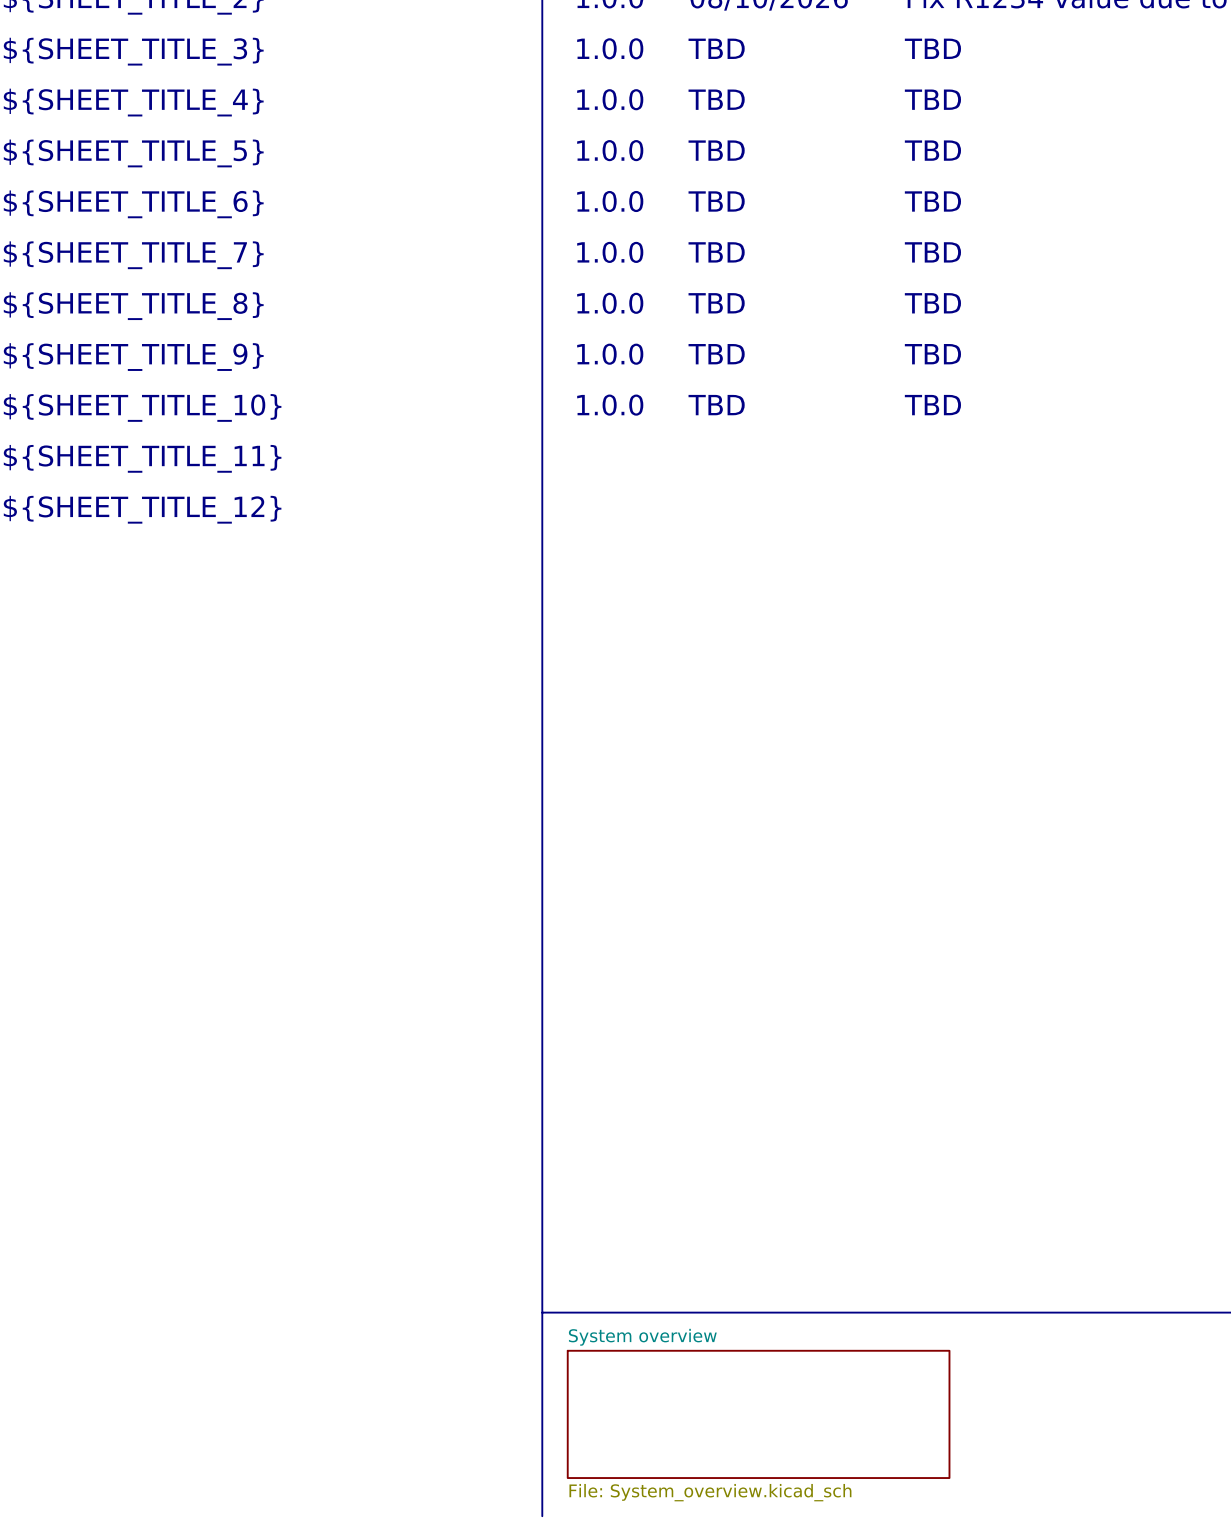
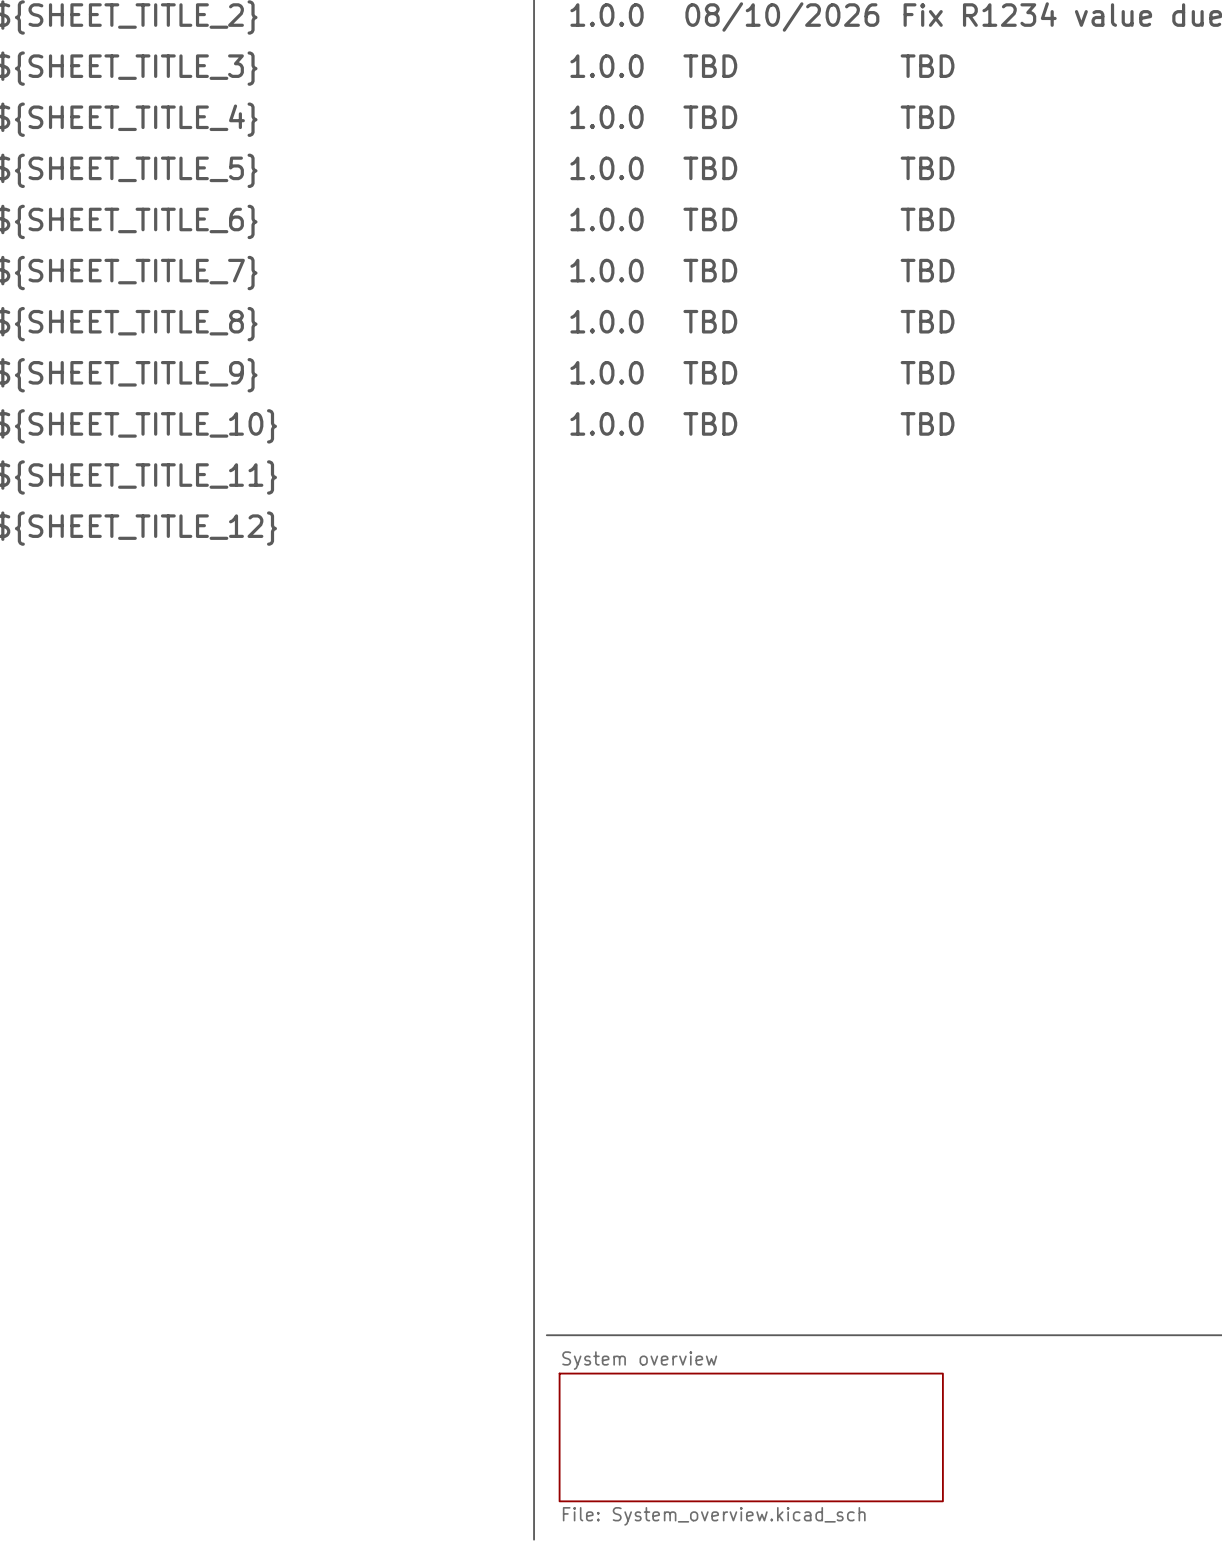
line: (542, 1312) (555, 1312) -> none

